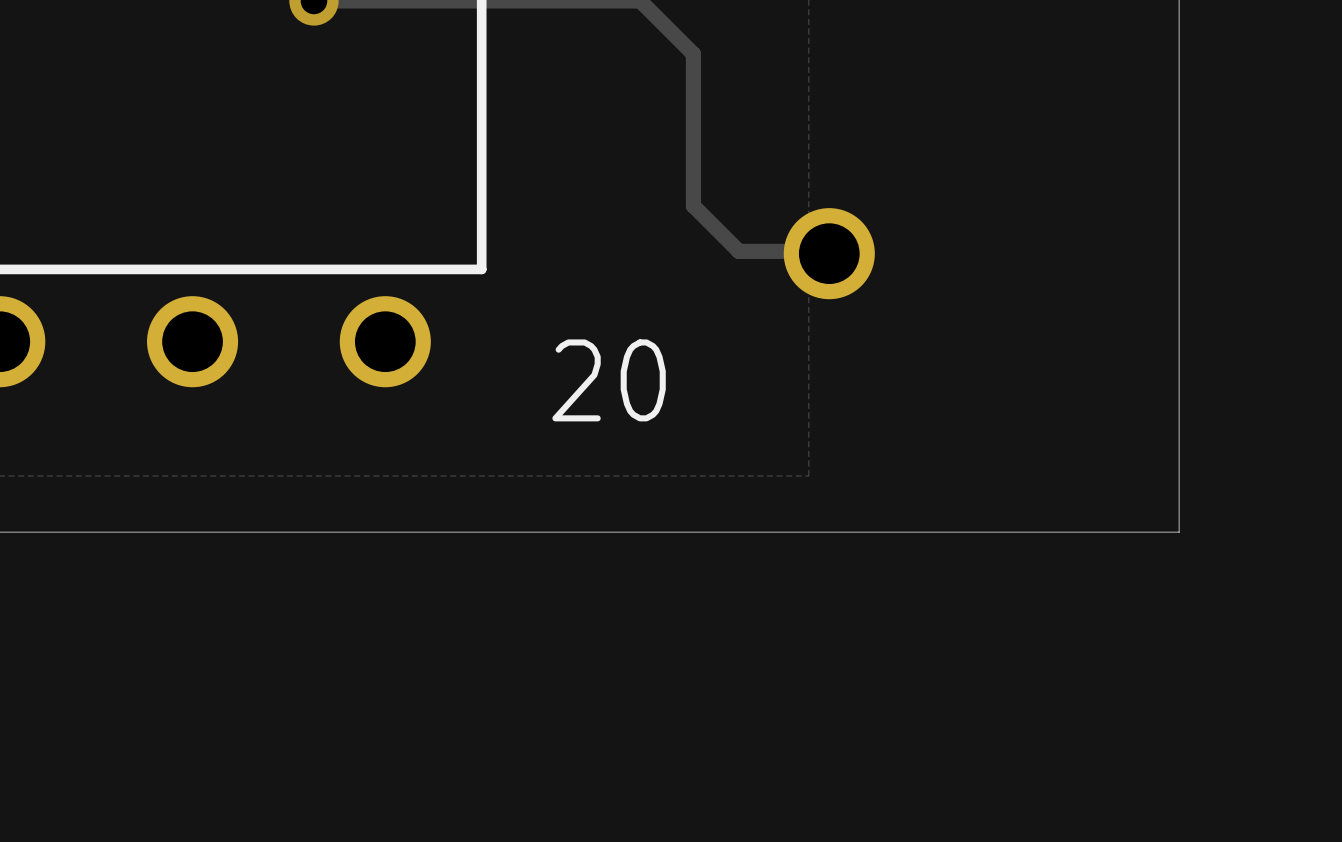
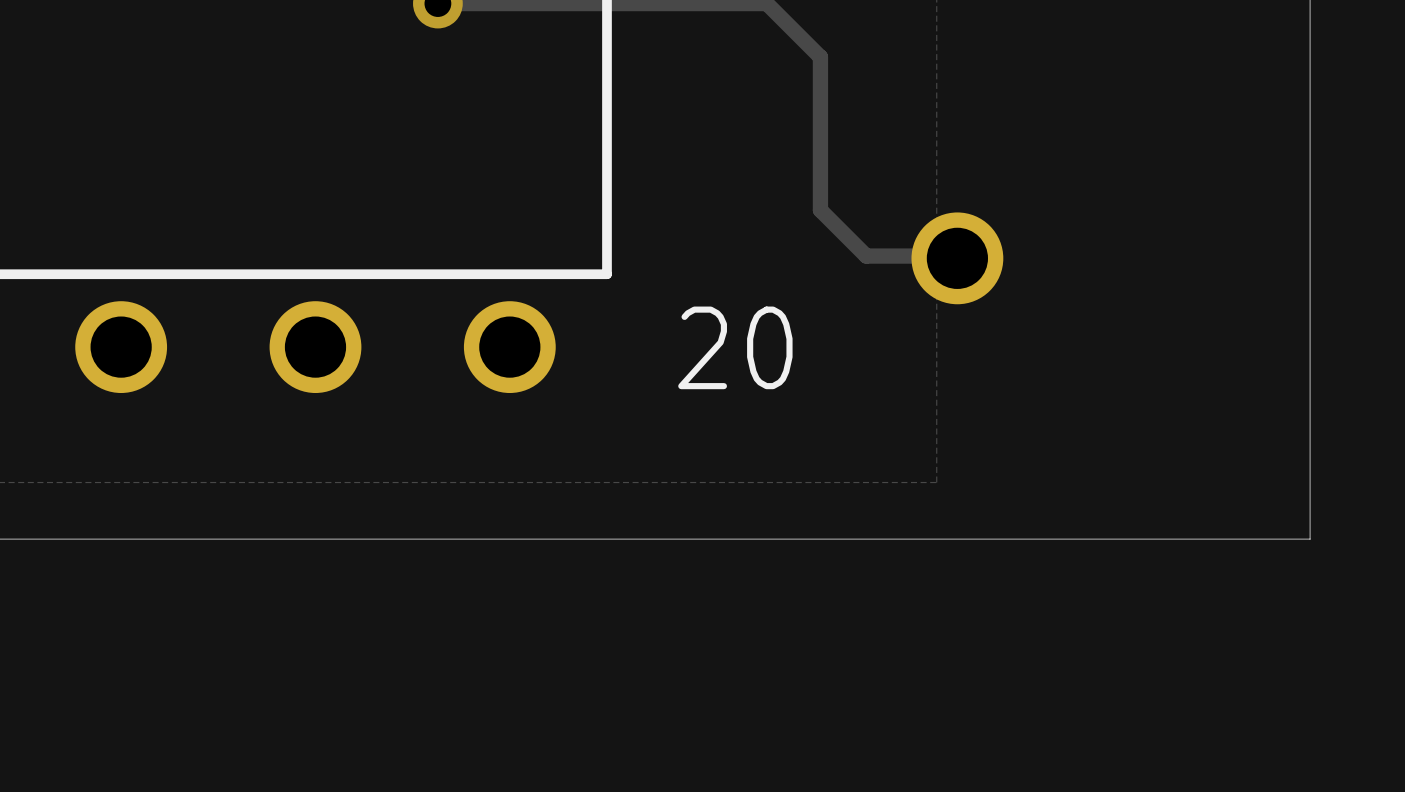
text position: 20 (609, 380) -> 20 (735, 347)

